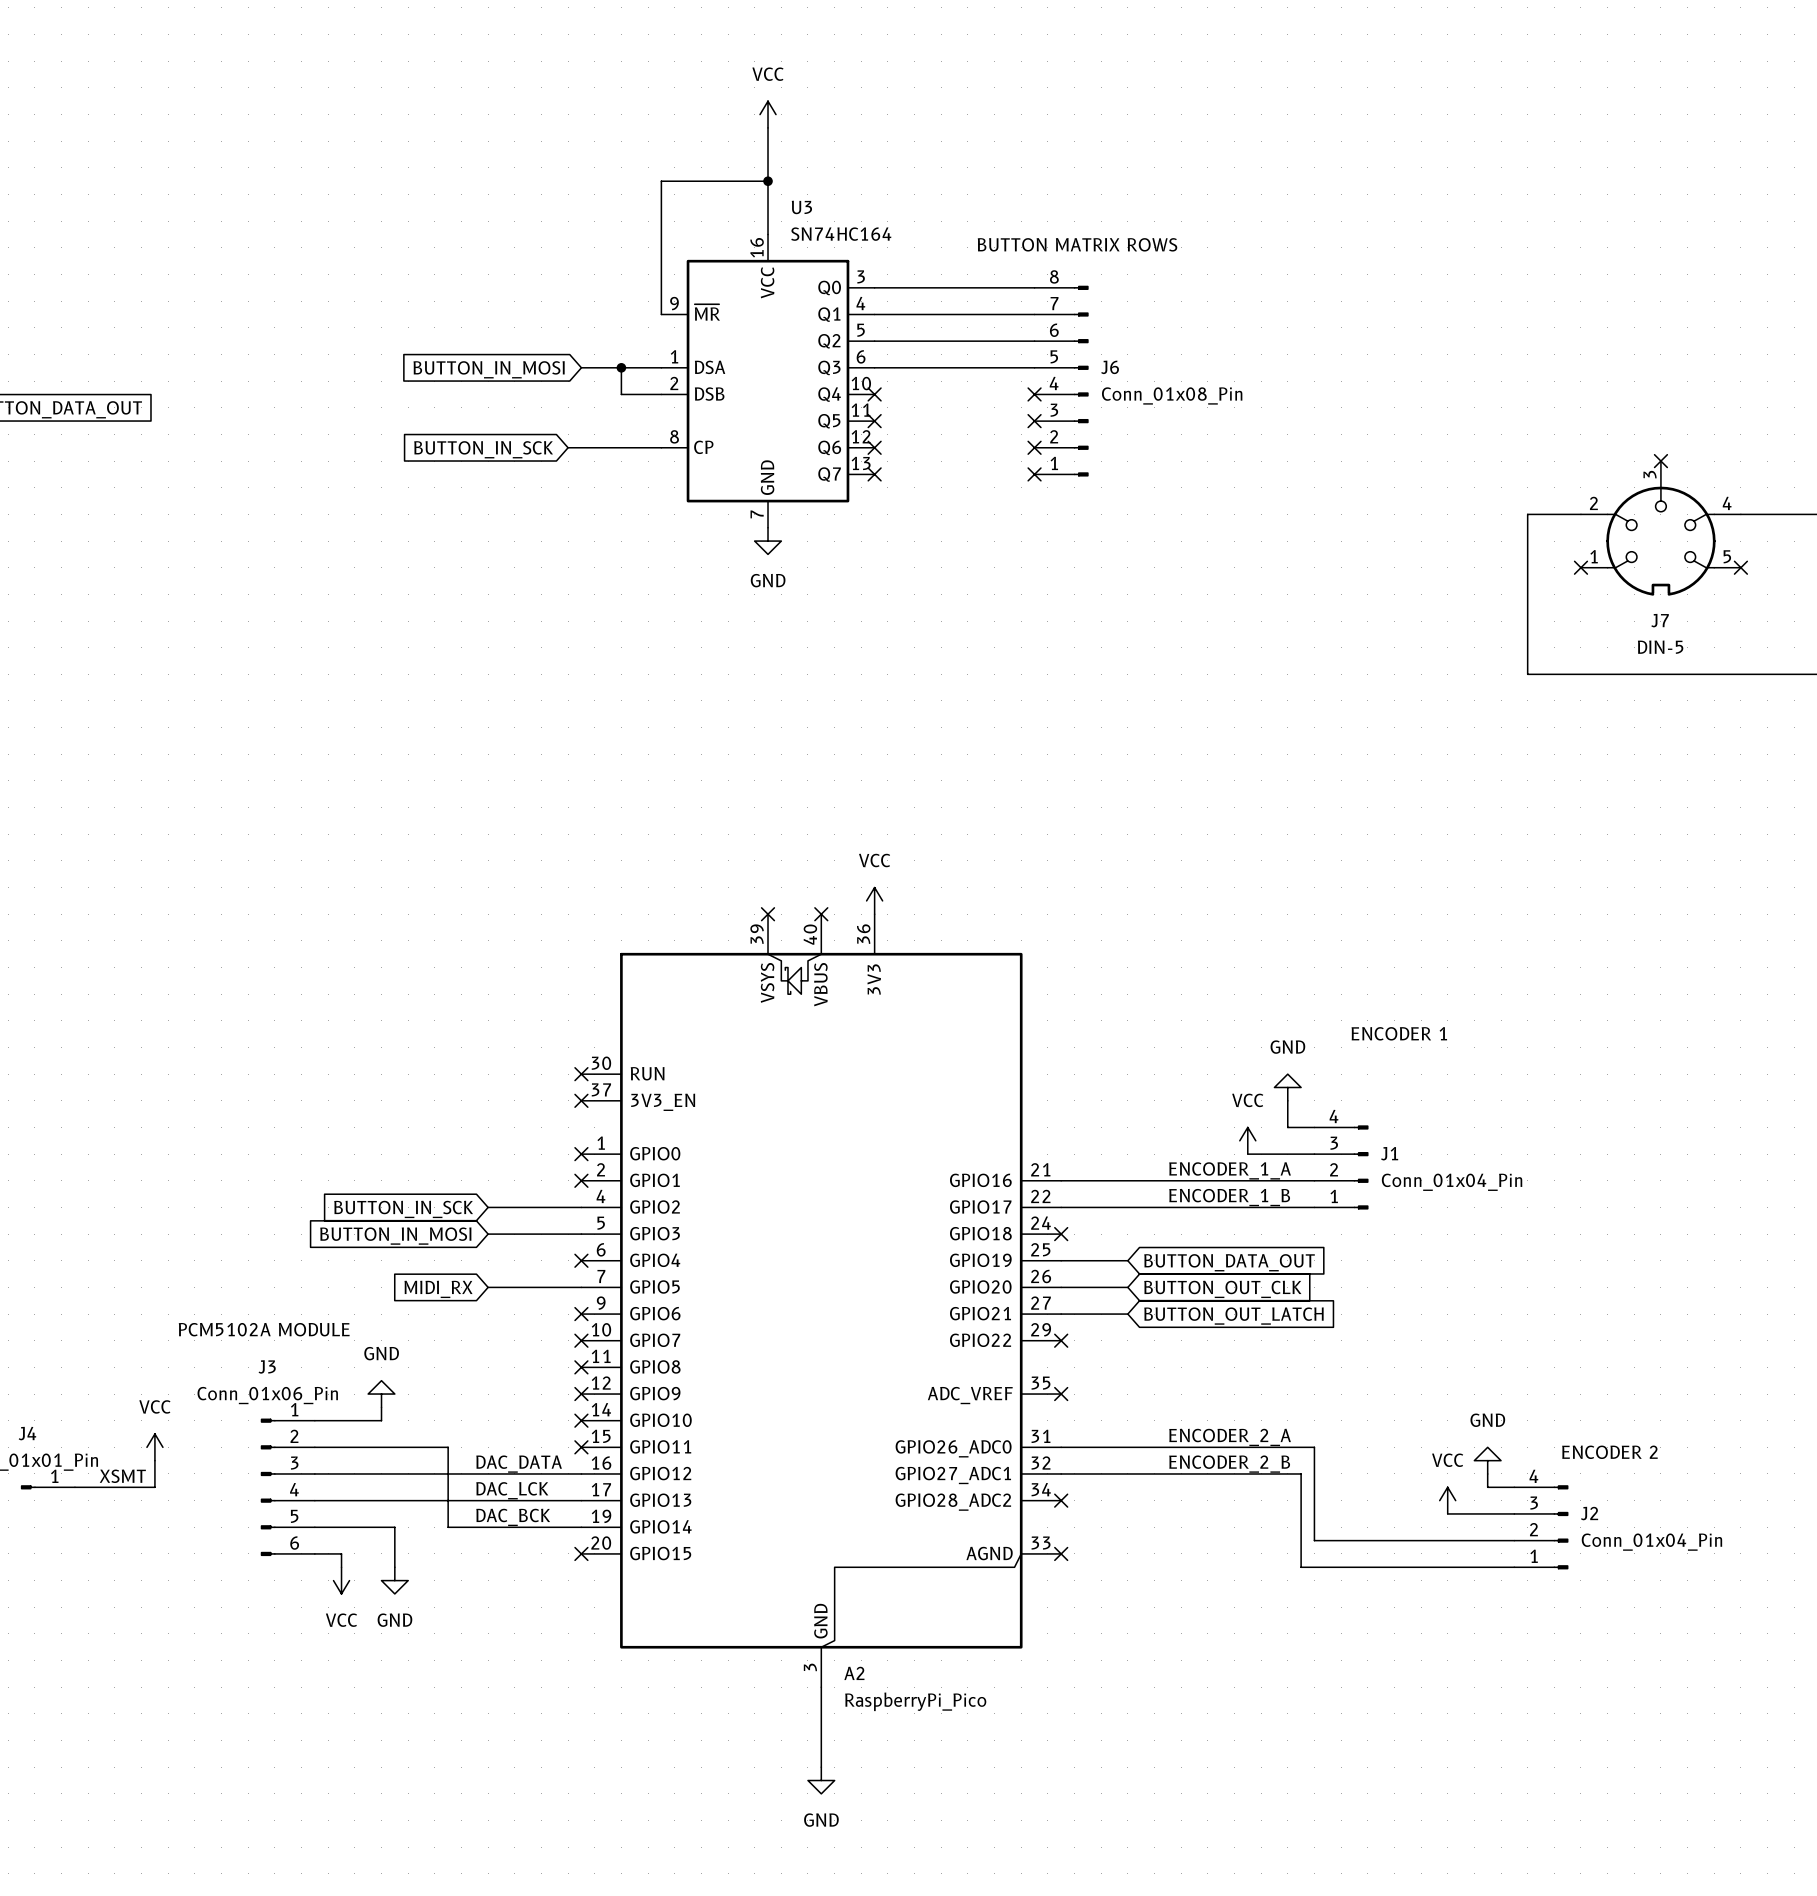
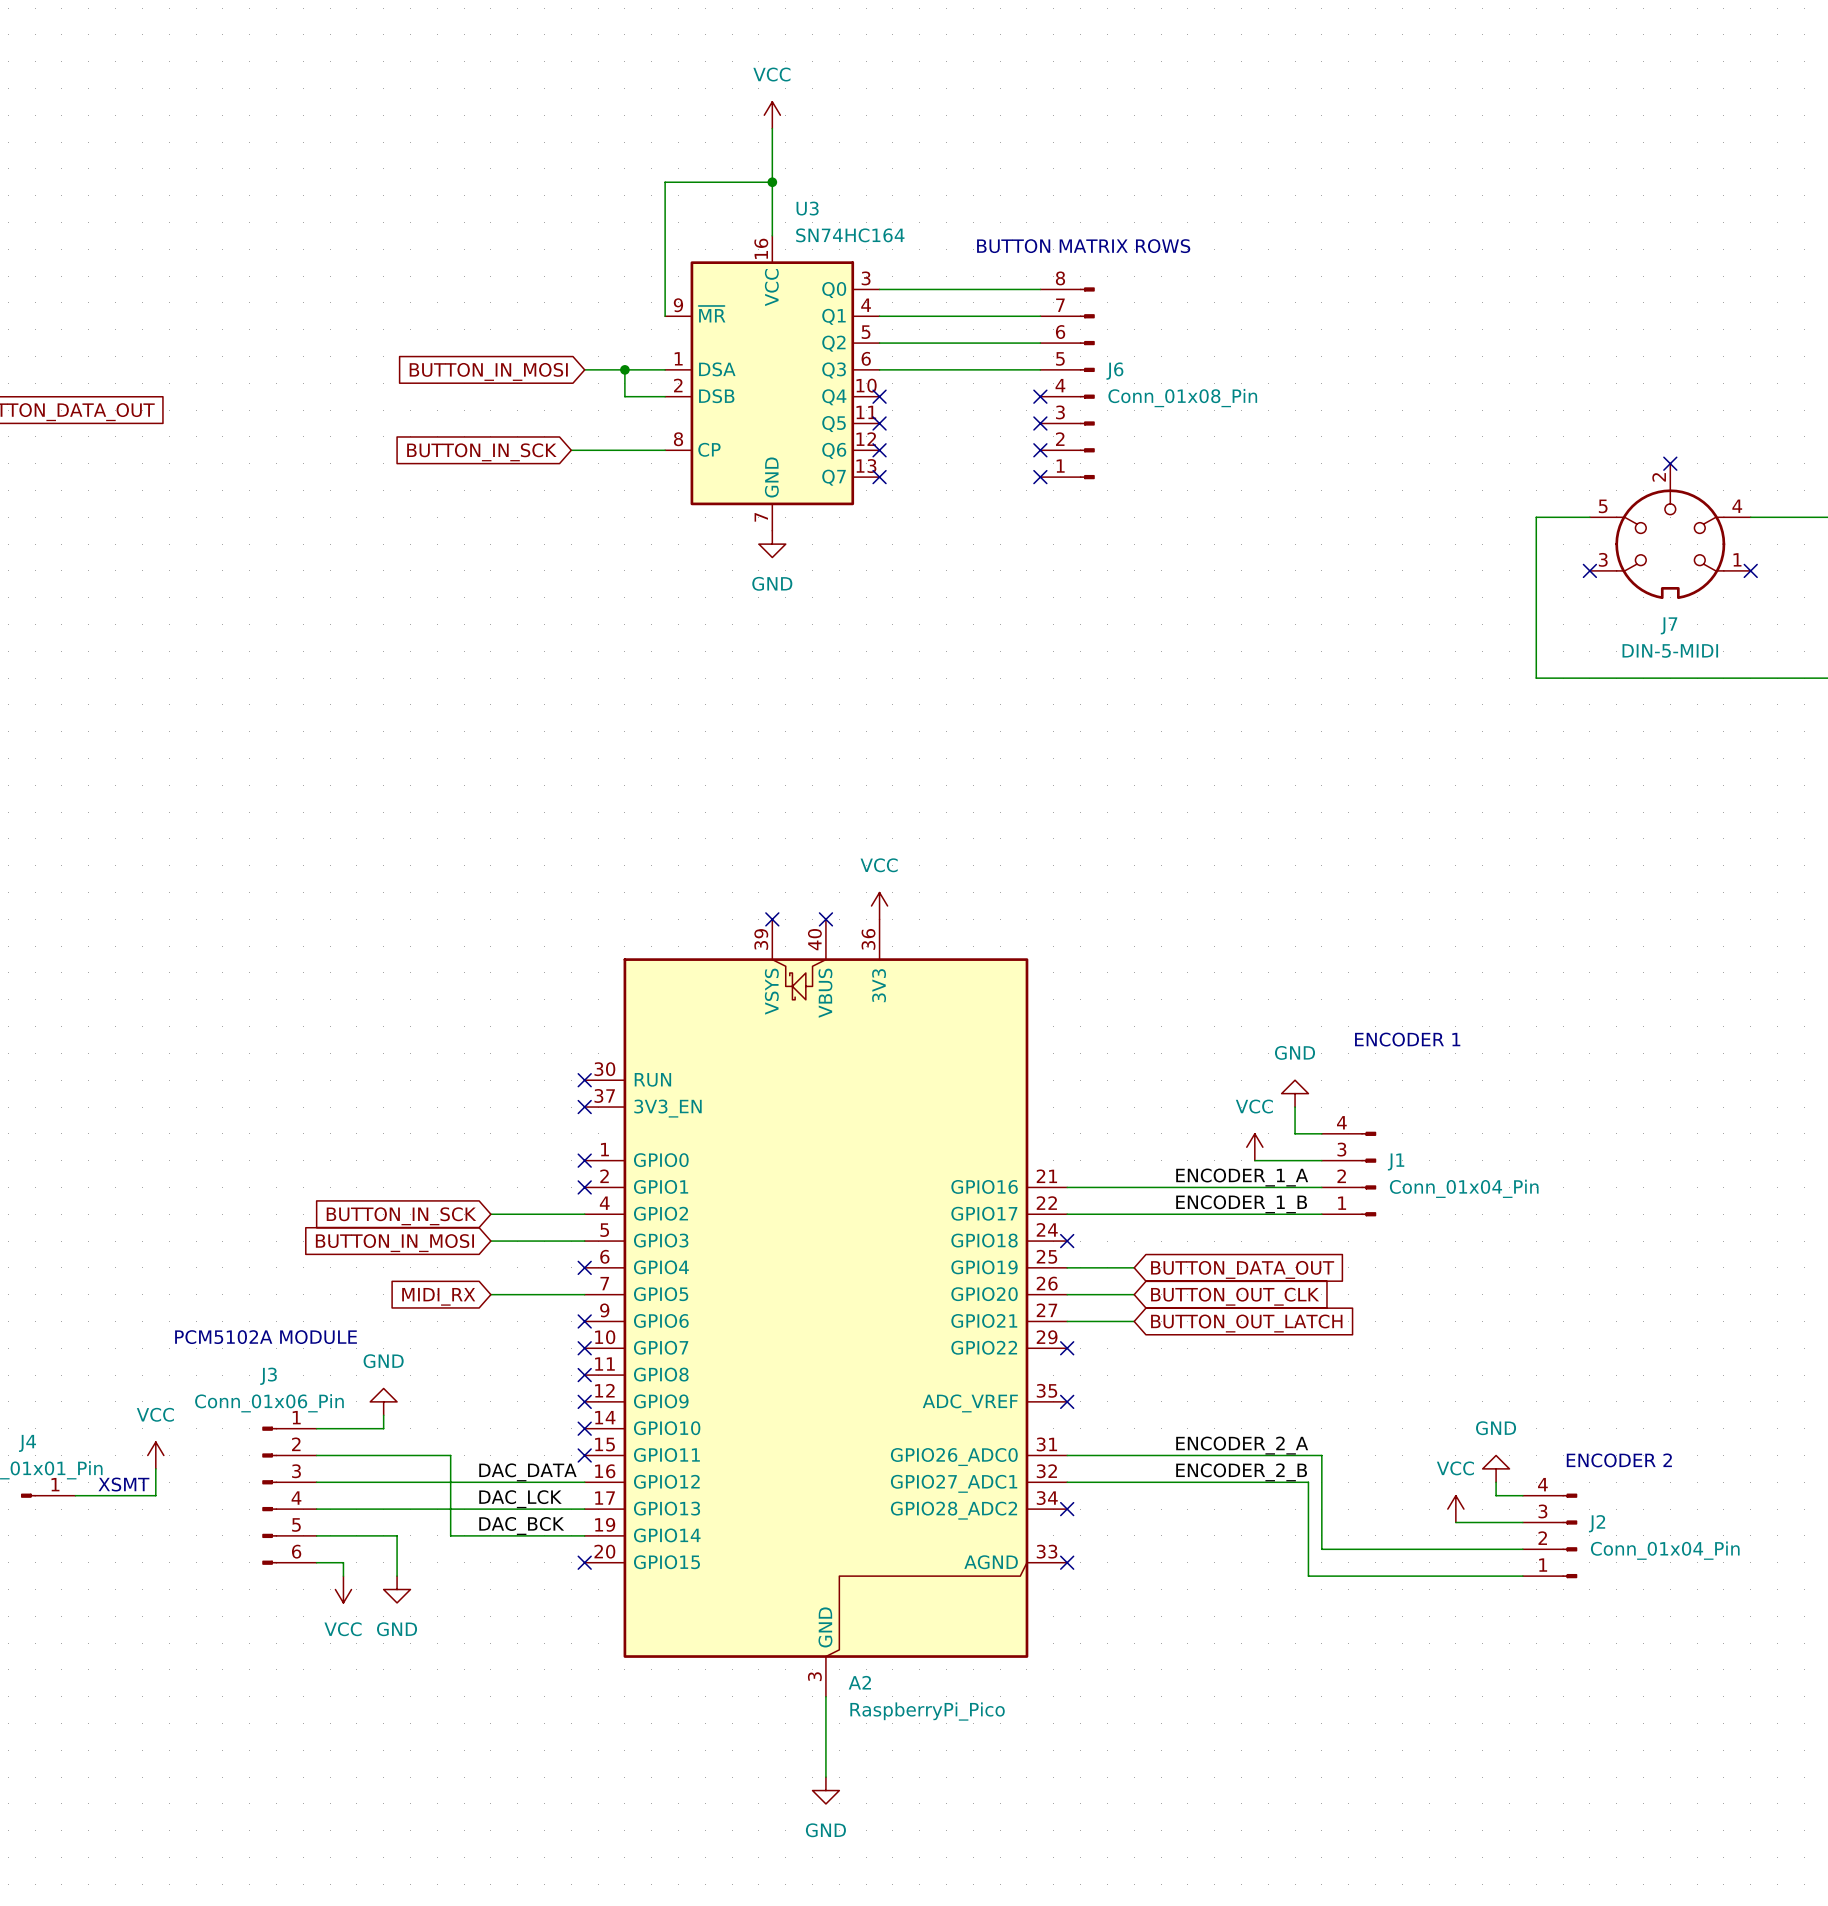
J7 pin number: 3 (1650, 474) -> 2 (1659, 477)
J7 pin number: 2 (1593, 503) -> 5 (1603, 506)
J7 pin number: 1 (1594, 556) -> 3 (1603, 559)
J7 pin number: 5 (1727, 556) -> 1 (1737, 559)
J7 value: DIN-5 (1660, 647) -> DIN-5-MIDI (1670, 650)

